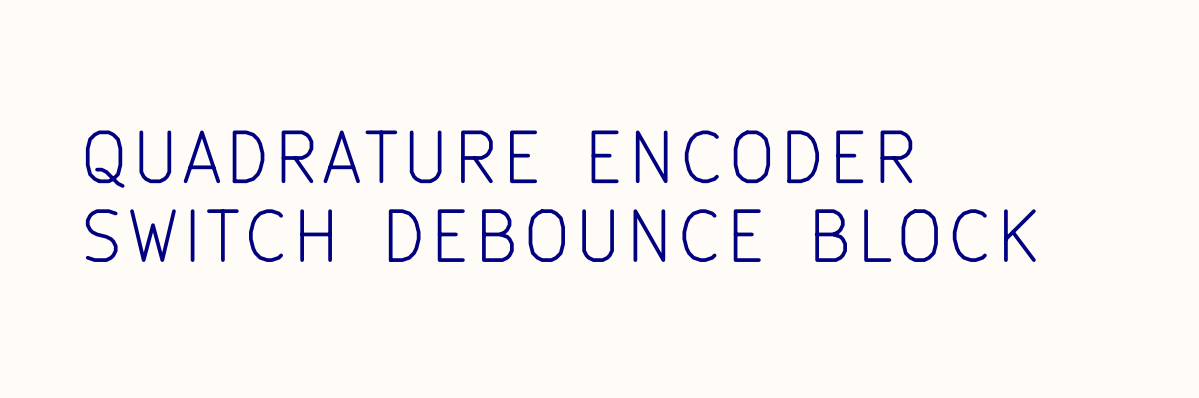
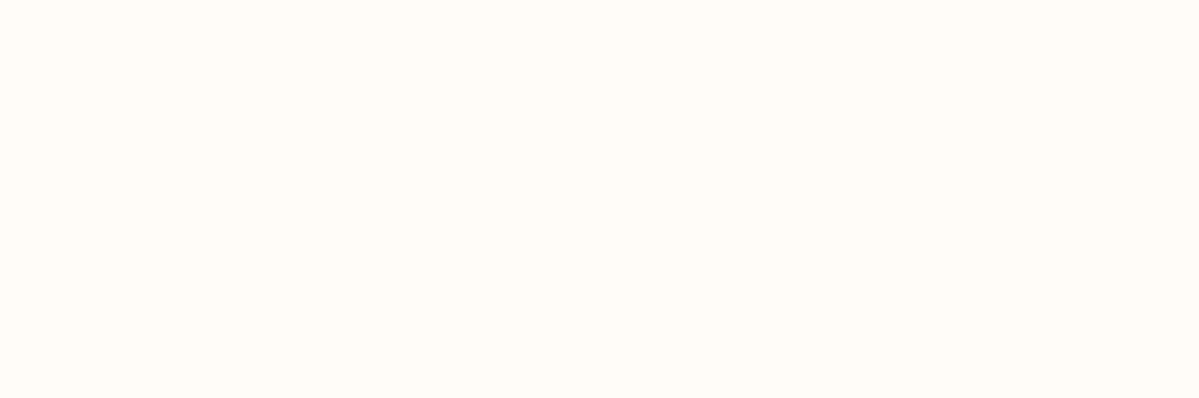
text: QUADRATURE ENCODER (499, 159) -> none
text: SWITCH DEBOUNCE BLOCK (560, 235) -> none

